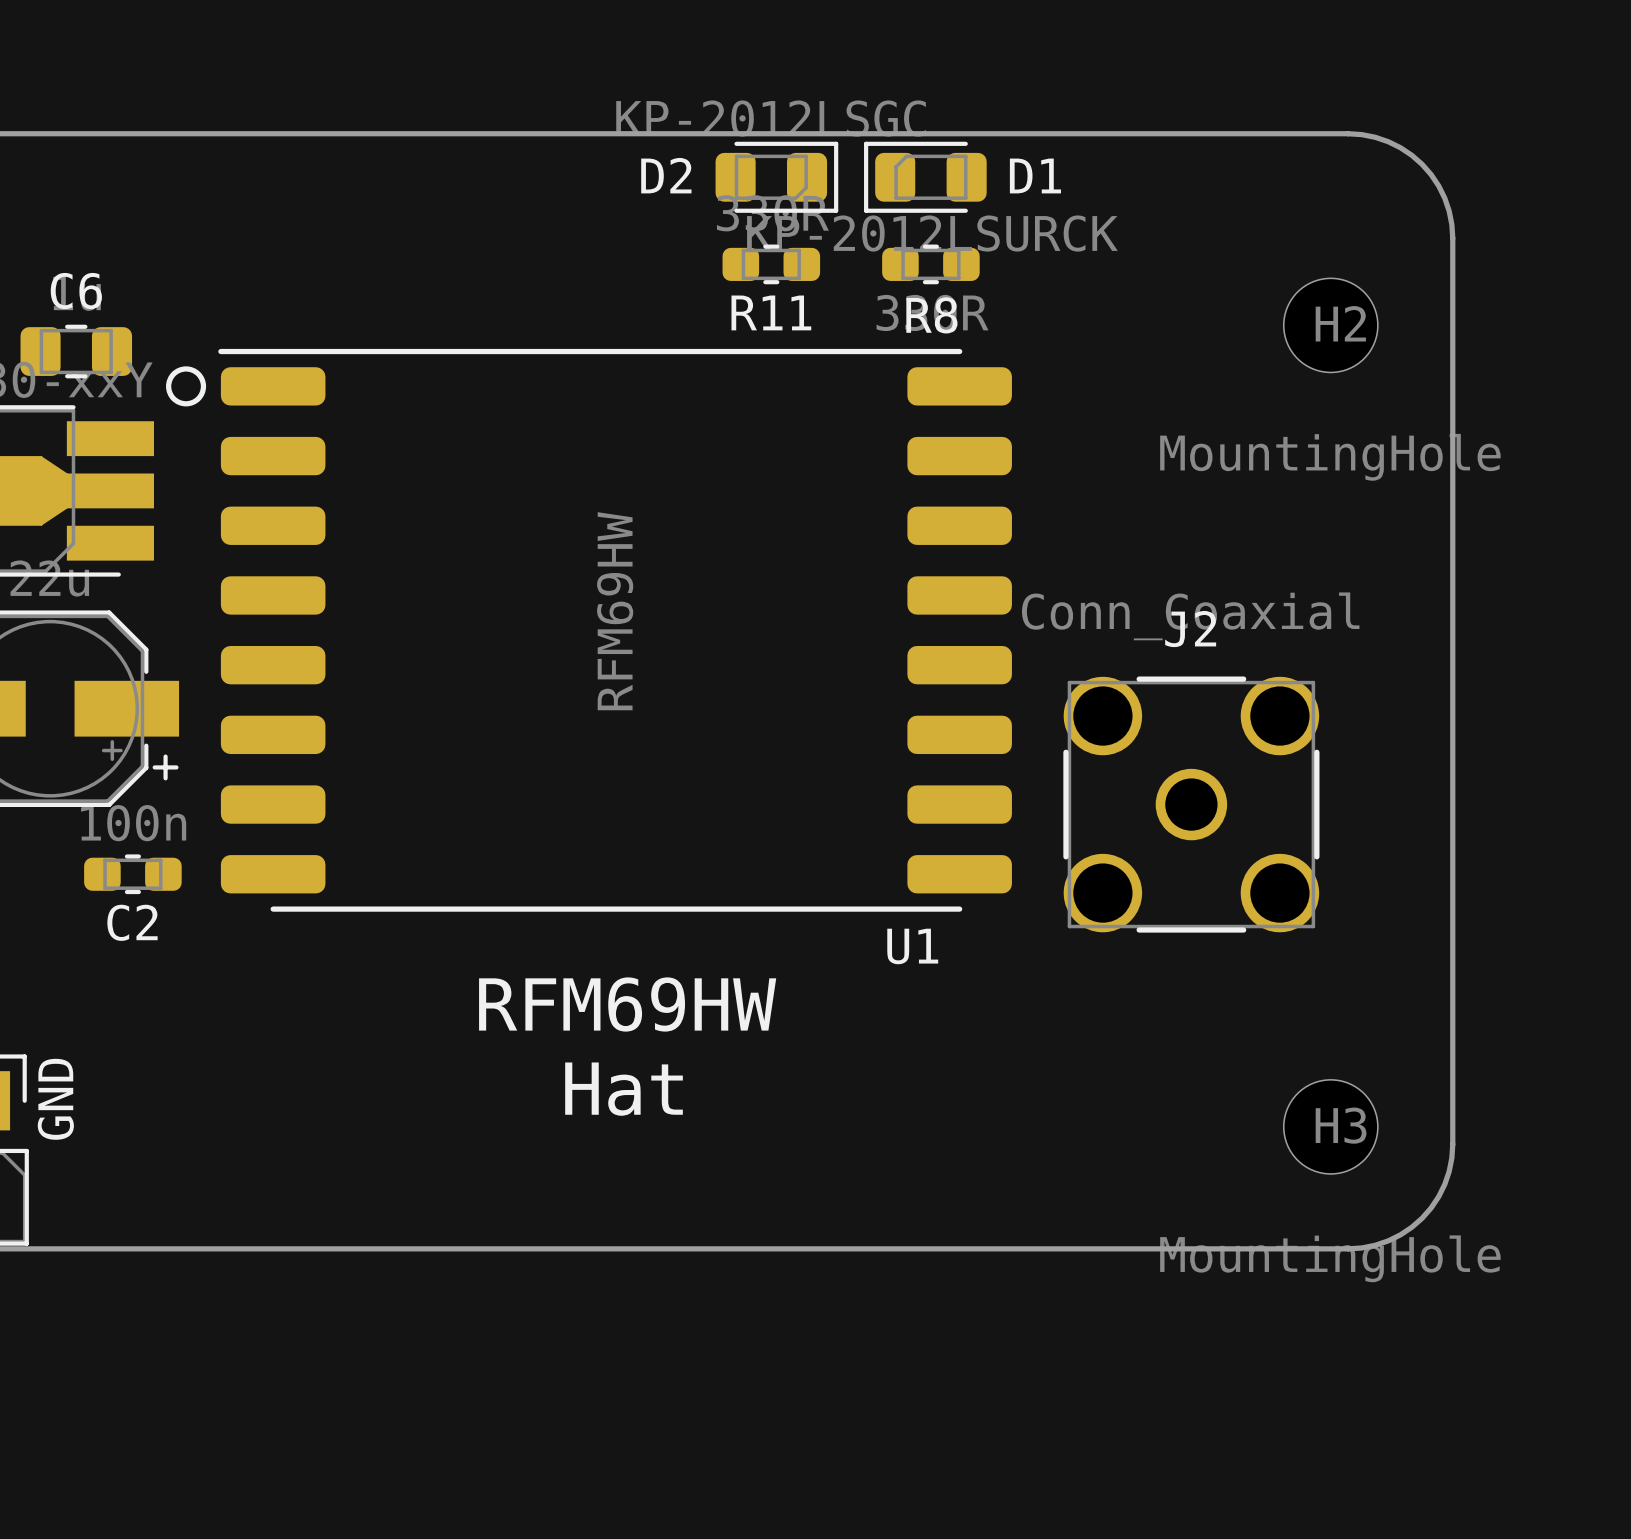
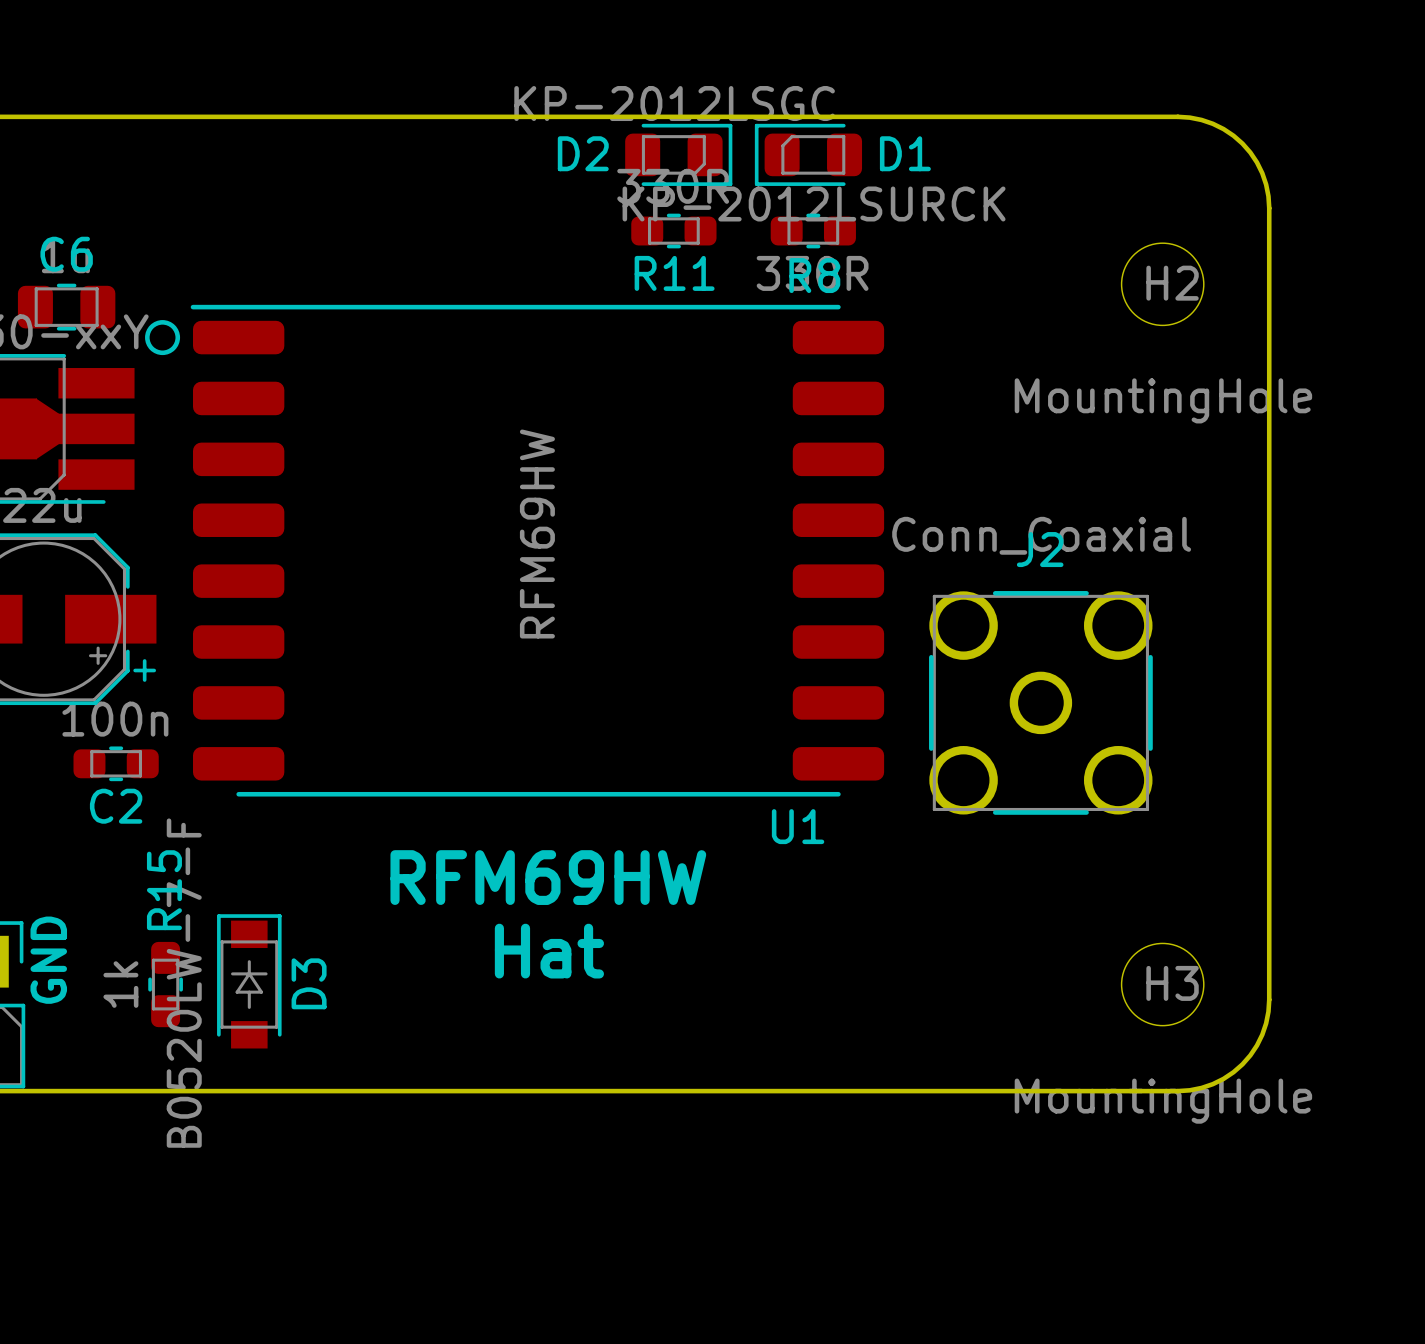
D3: none -> B0520LW-7-F (249, 981)
R15: none -> 1k (165, 984)

